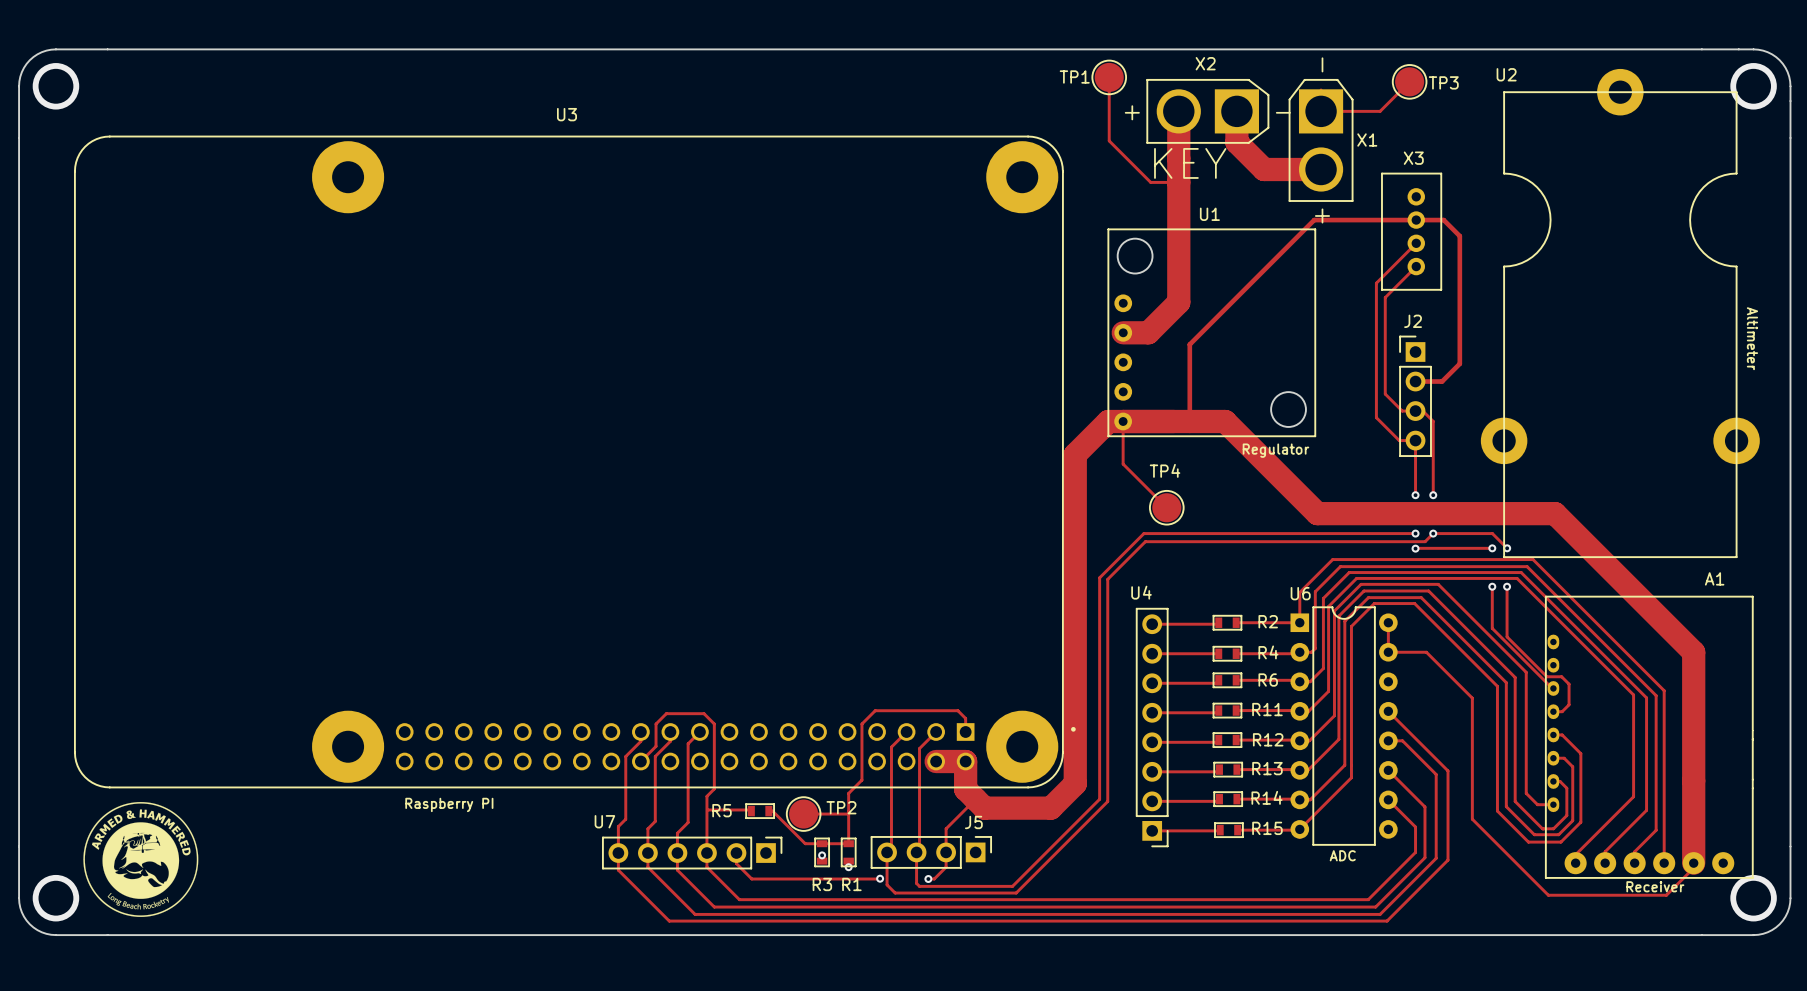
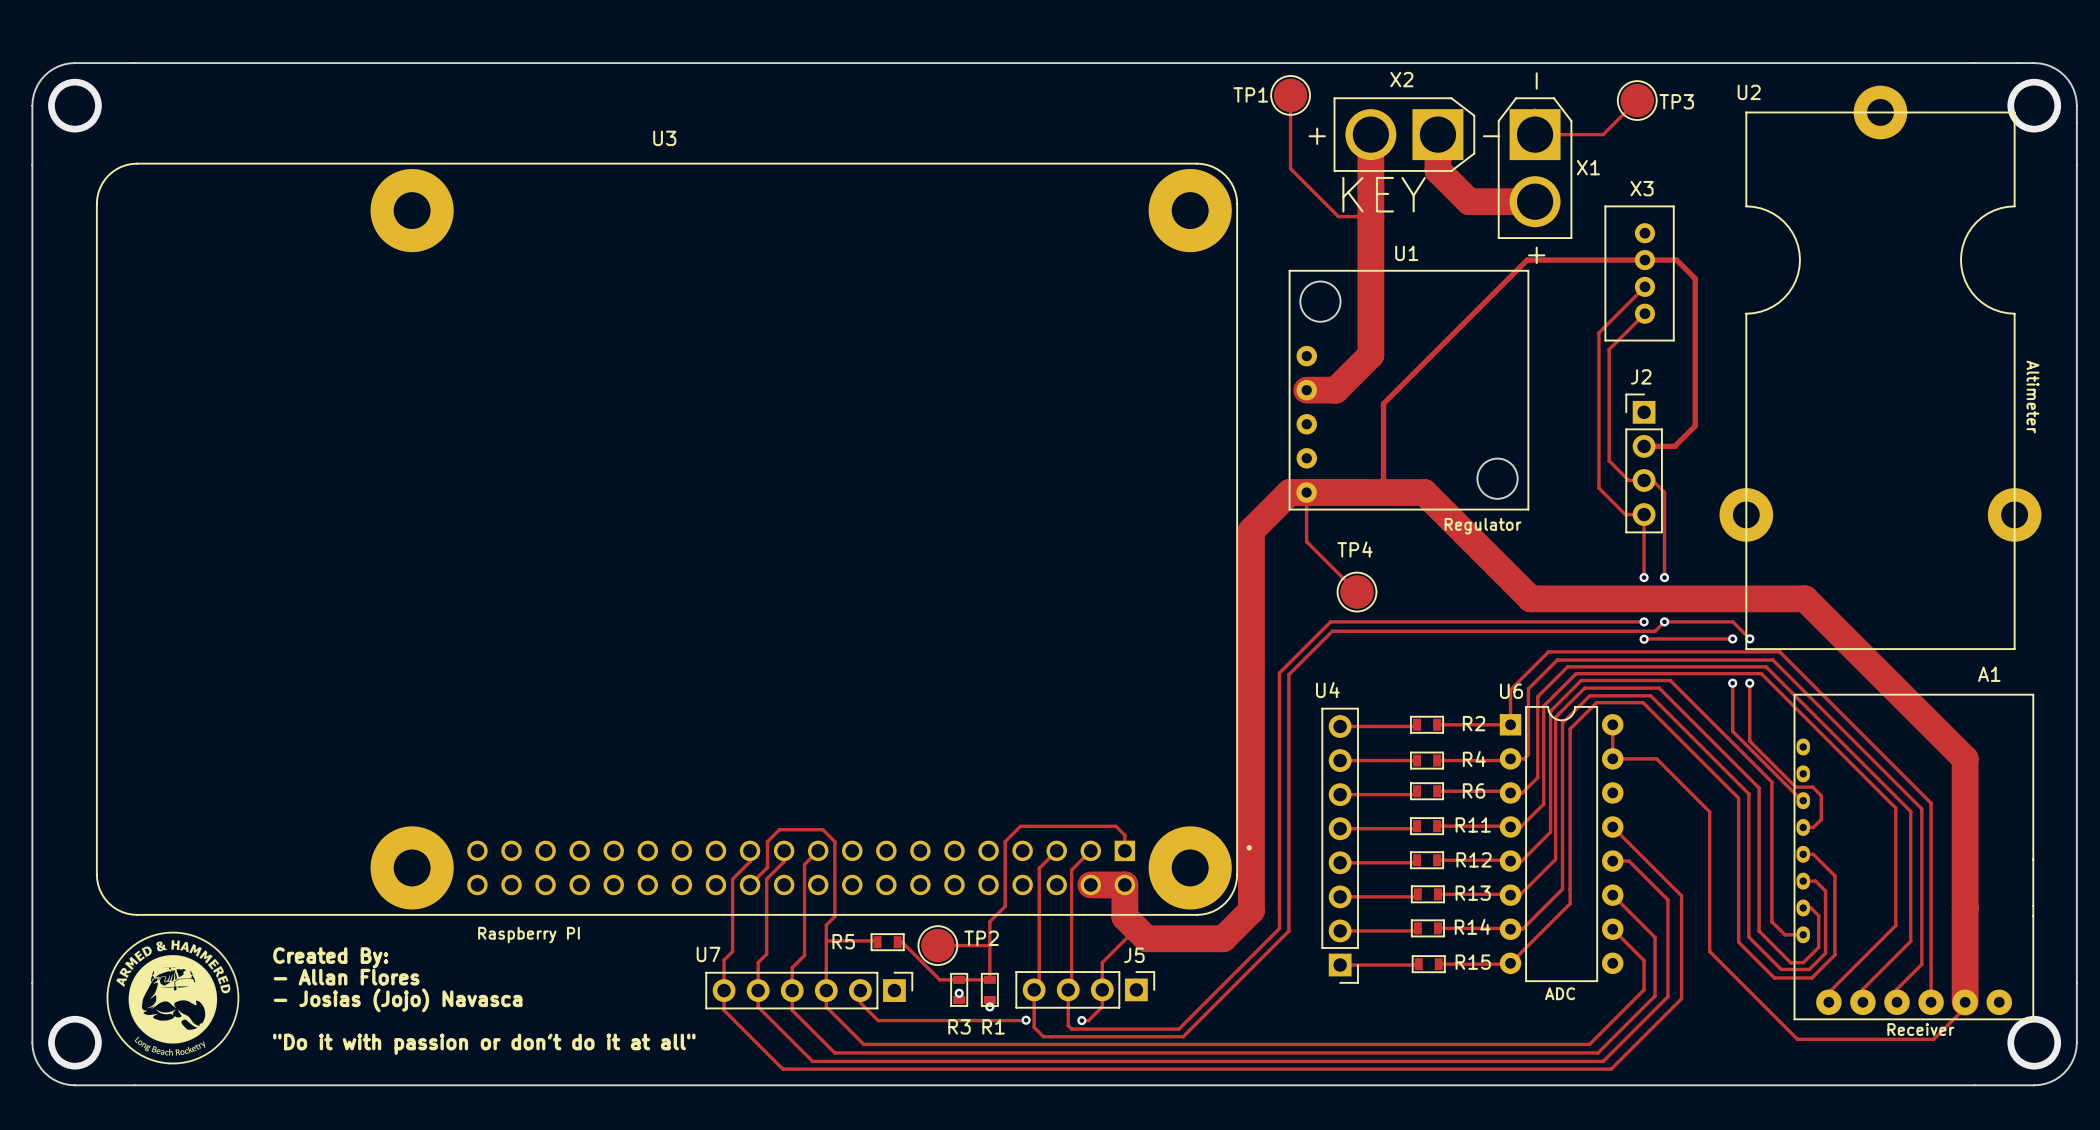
text: none -> Created By: (330, 957)
text: none -> - Allan Flores (346, 977)
text: none -> - Josias (Jojo) Navasca (398, 1000)
text: none -> "Do it with passion or don't do it at all" (484, 1044)

